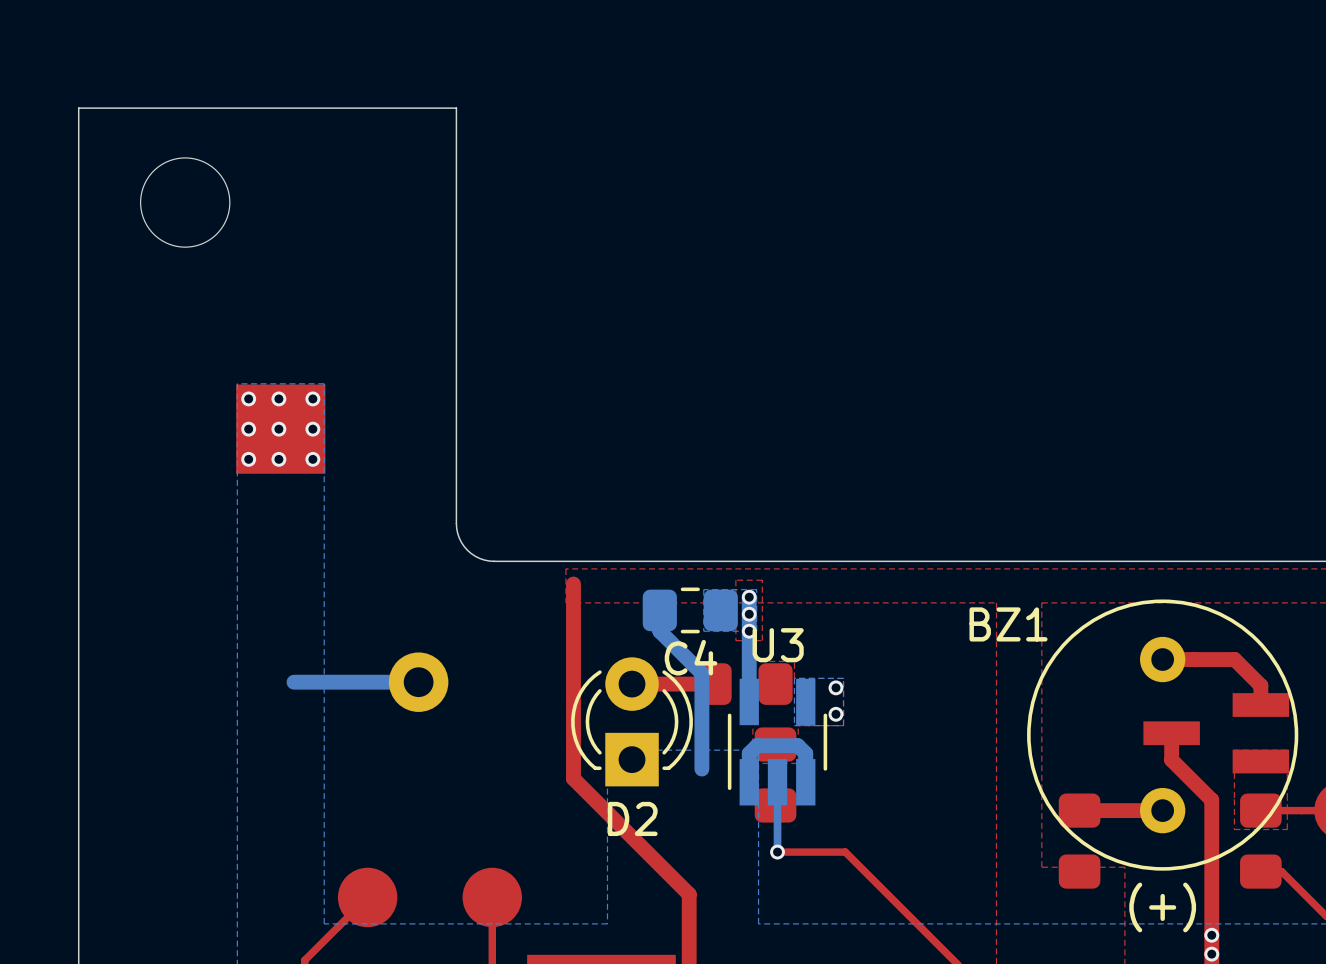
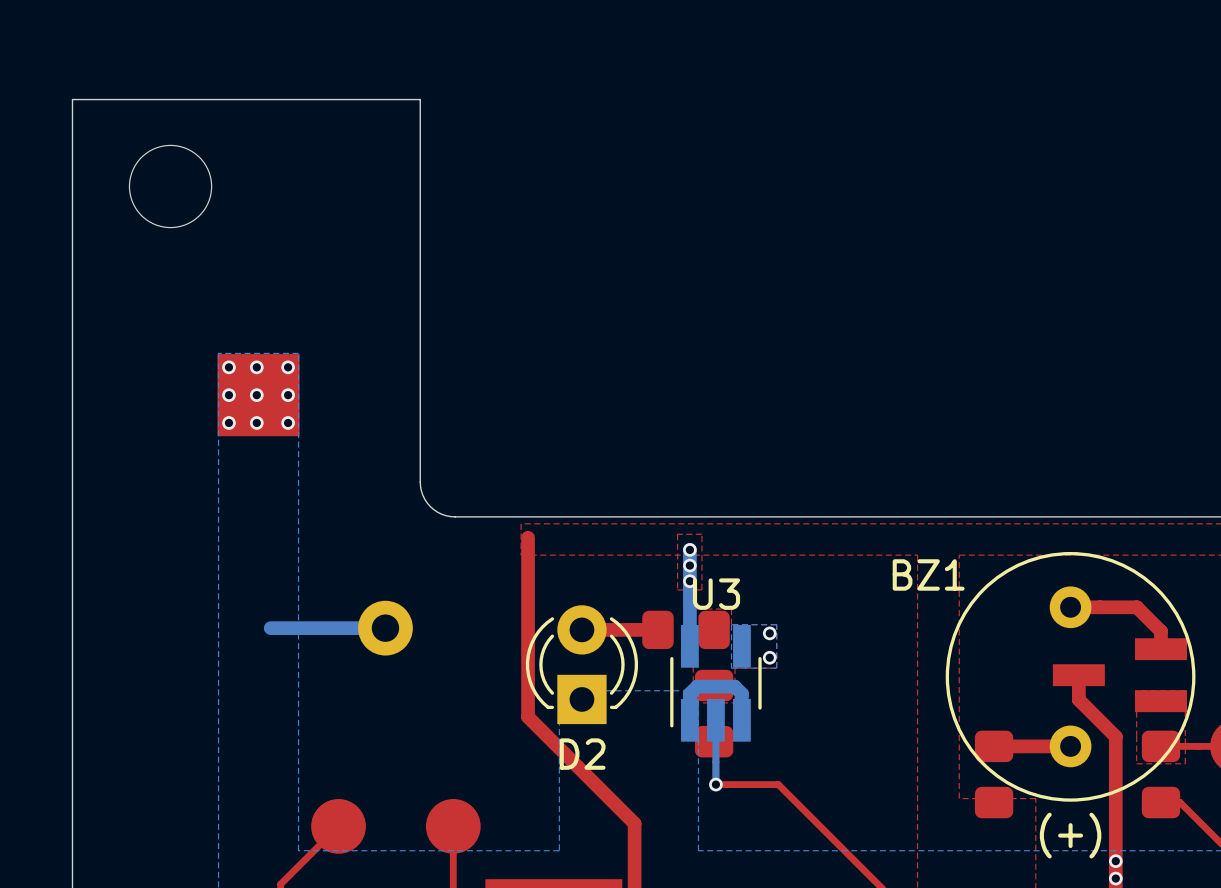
bottom zone outline: (756, 589) (756, 631) (703, 631) (703, 589) (756, 589) -> none
bottom track: (659, 610) (659, 631) (701, 673) (701, 769) -> none
C4: (690, 610) -> none

